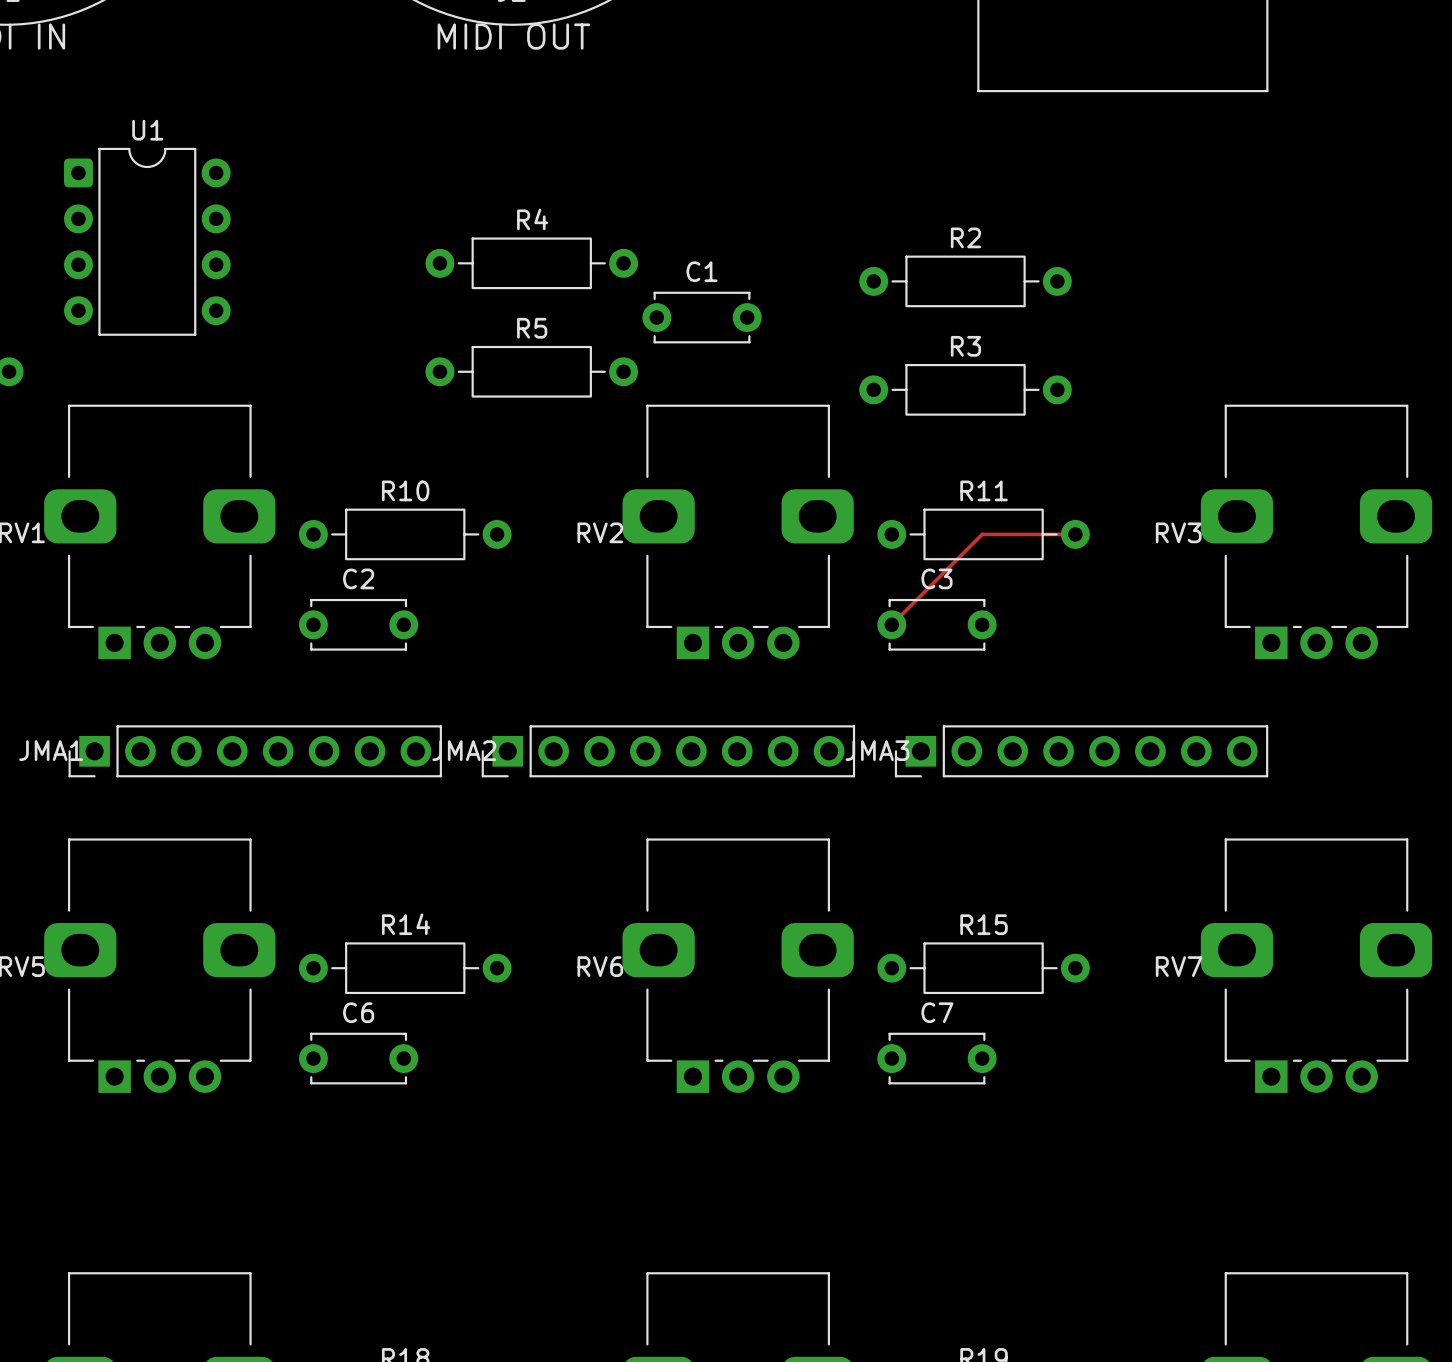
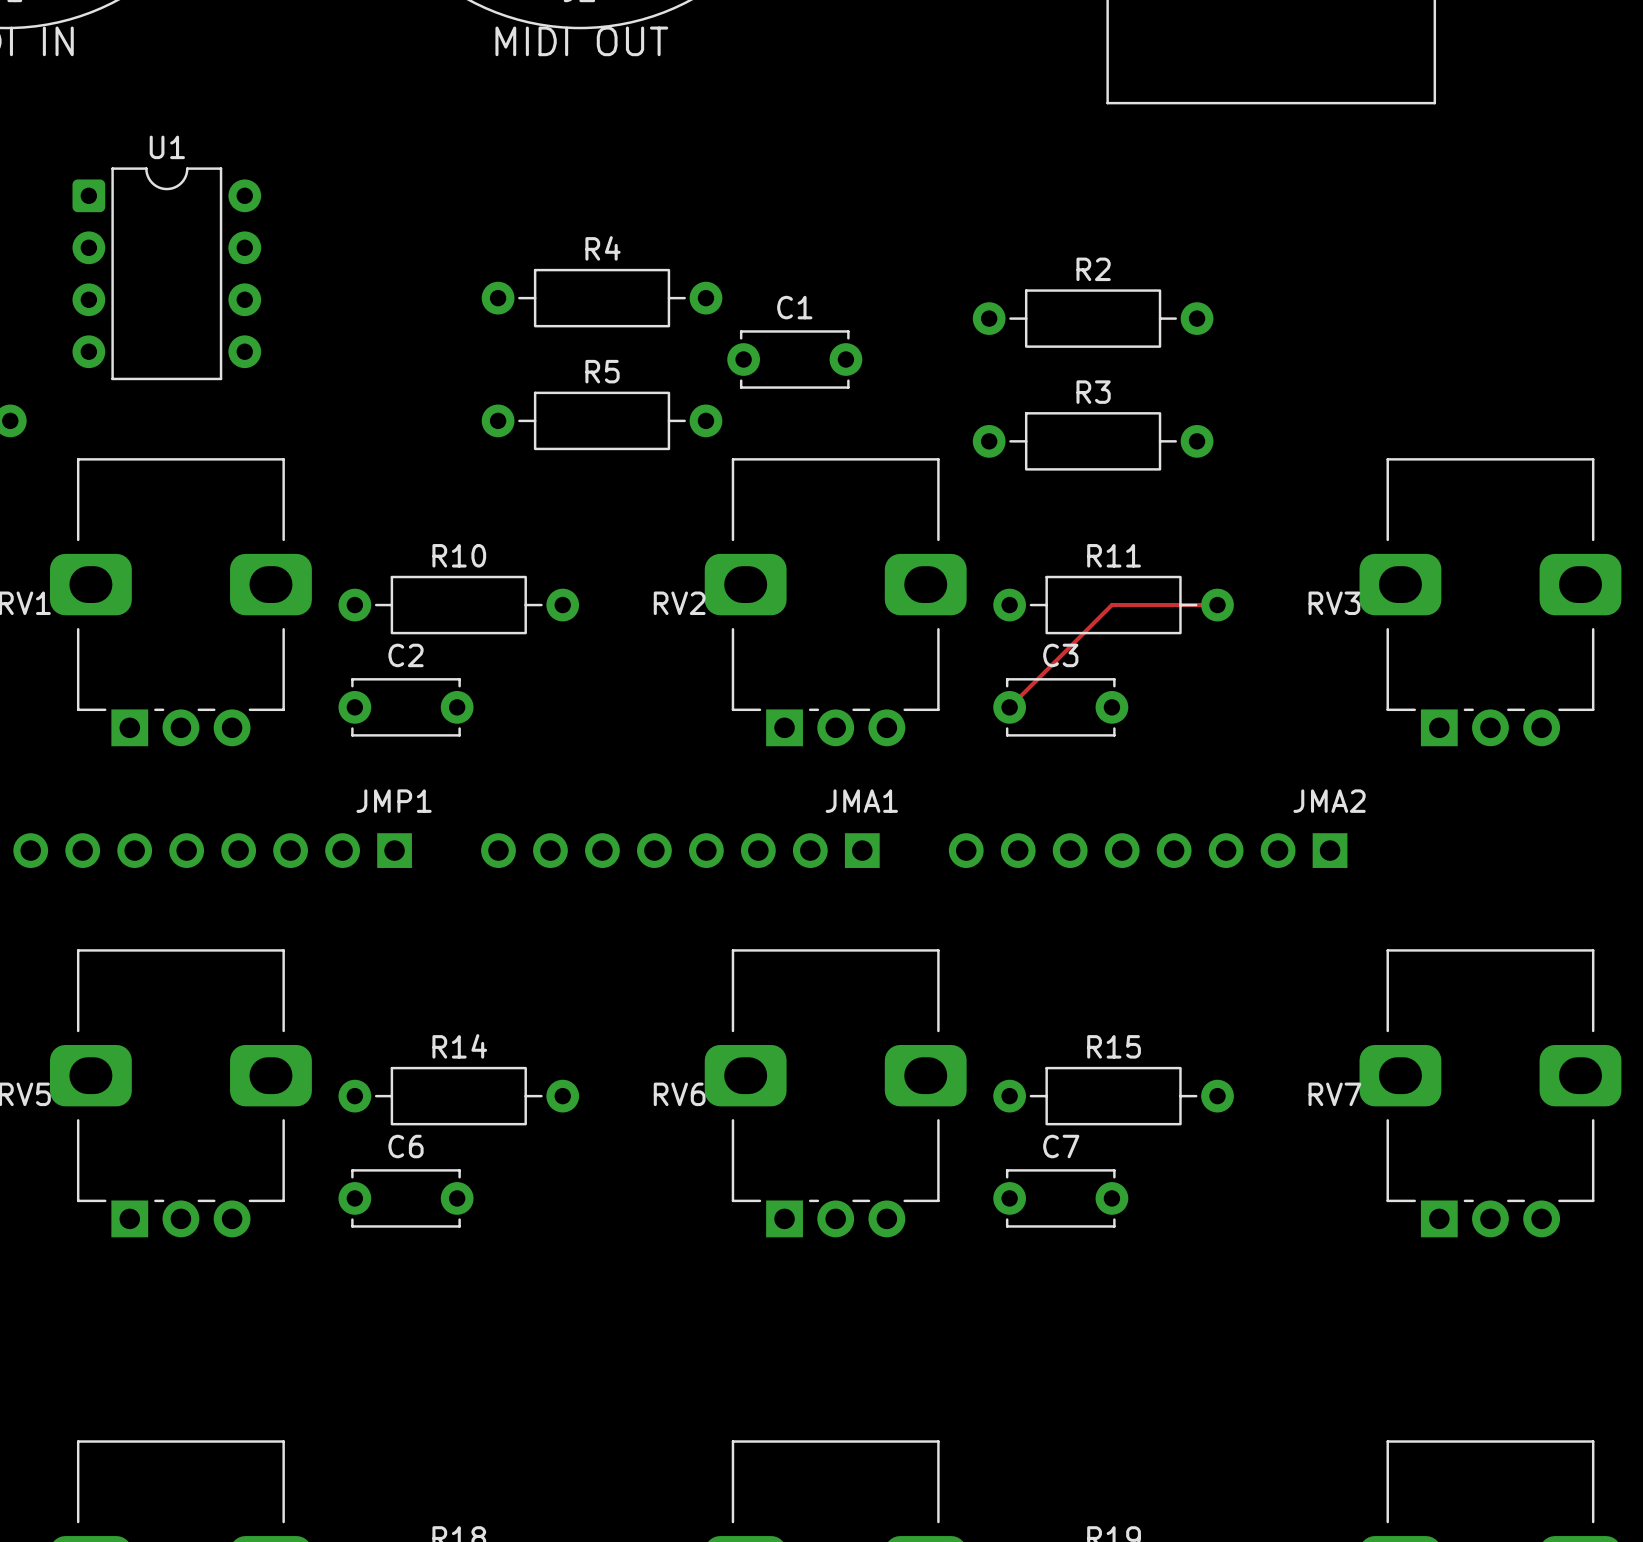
JMA1 footprint: [68, 725, 442, 778] -> [481, 833, 880, 868]
JMA2 footprint: [481, 725, 856, 778] -> [948, 833, 1348, 868]
JMA1 name position: JMA1 (51, 750) -> JMA1 (861, 801)
JMA2 name position: JMA2 (464, 750) -> JMA2 (1329, 801)
JMP1: none -> (212, 850)
JMA3: (1081, 751) -> none

